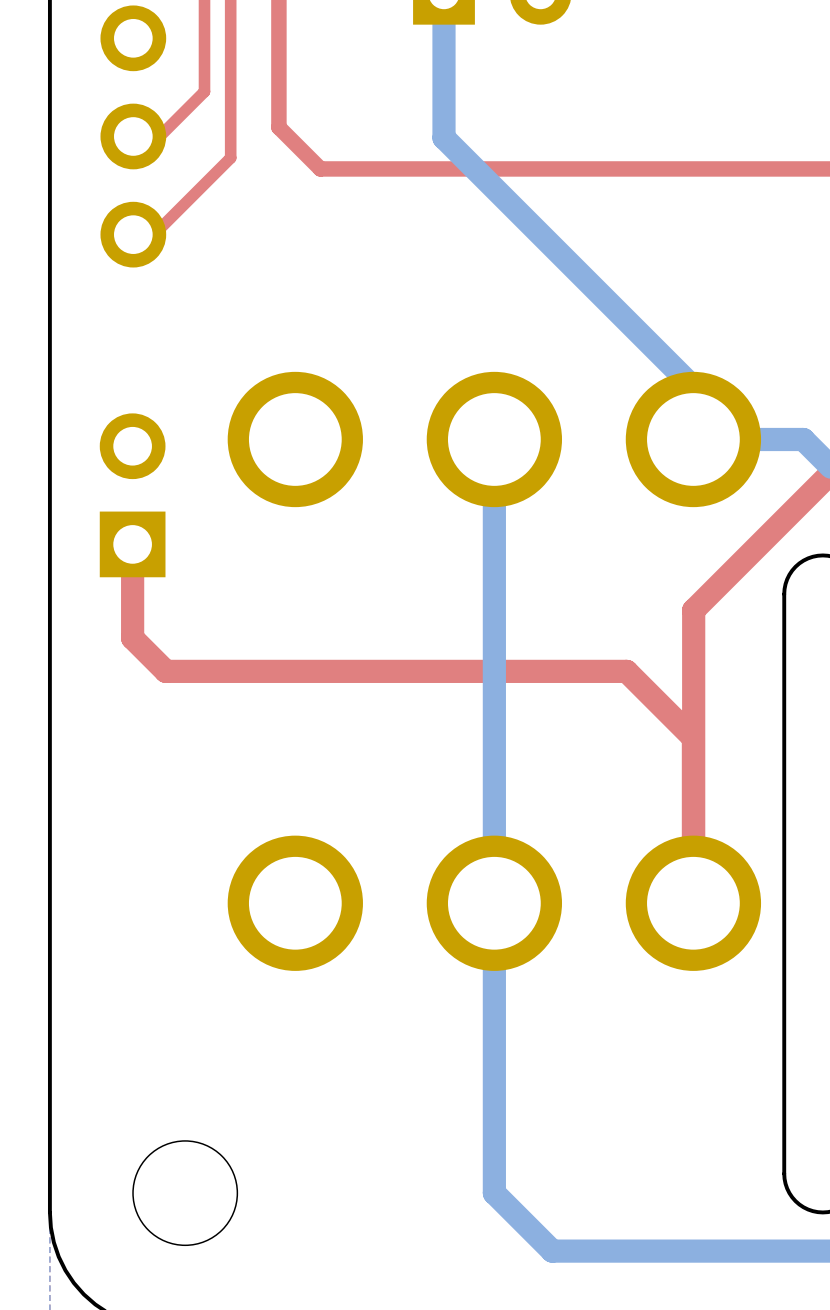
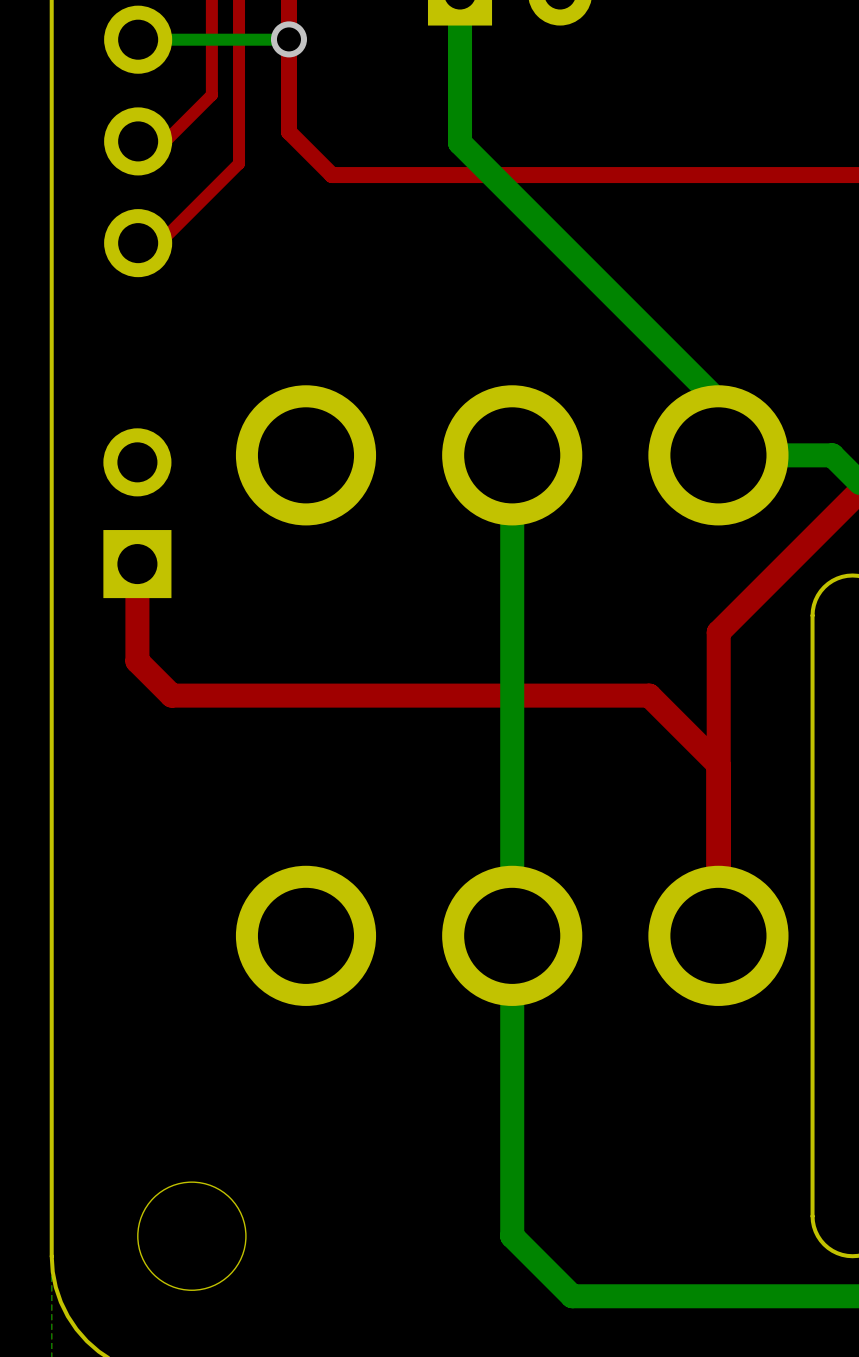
bottom track: none -> (288, 39) (138, 39)
via: none -> (288, 39)

